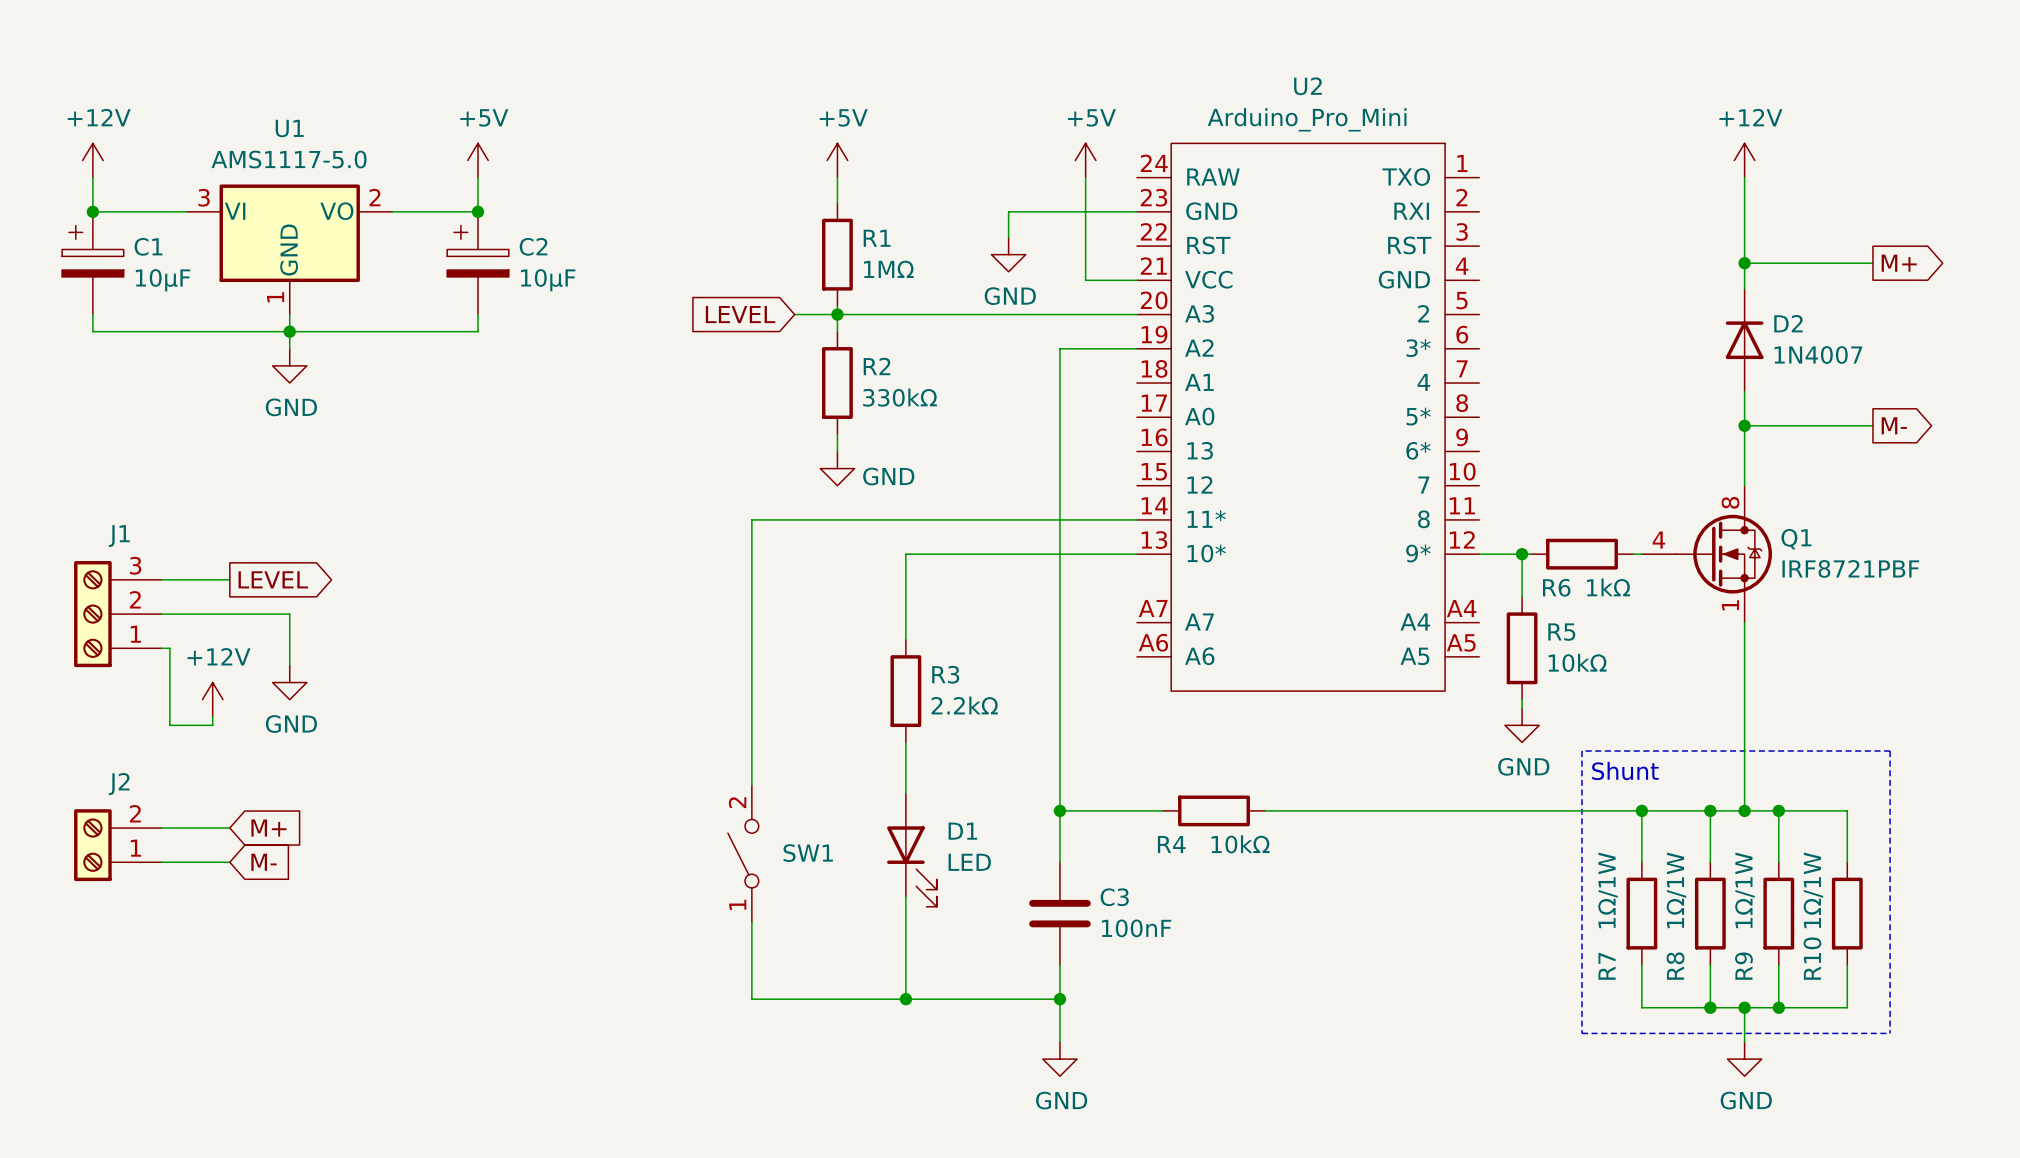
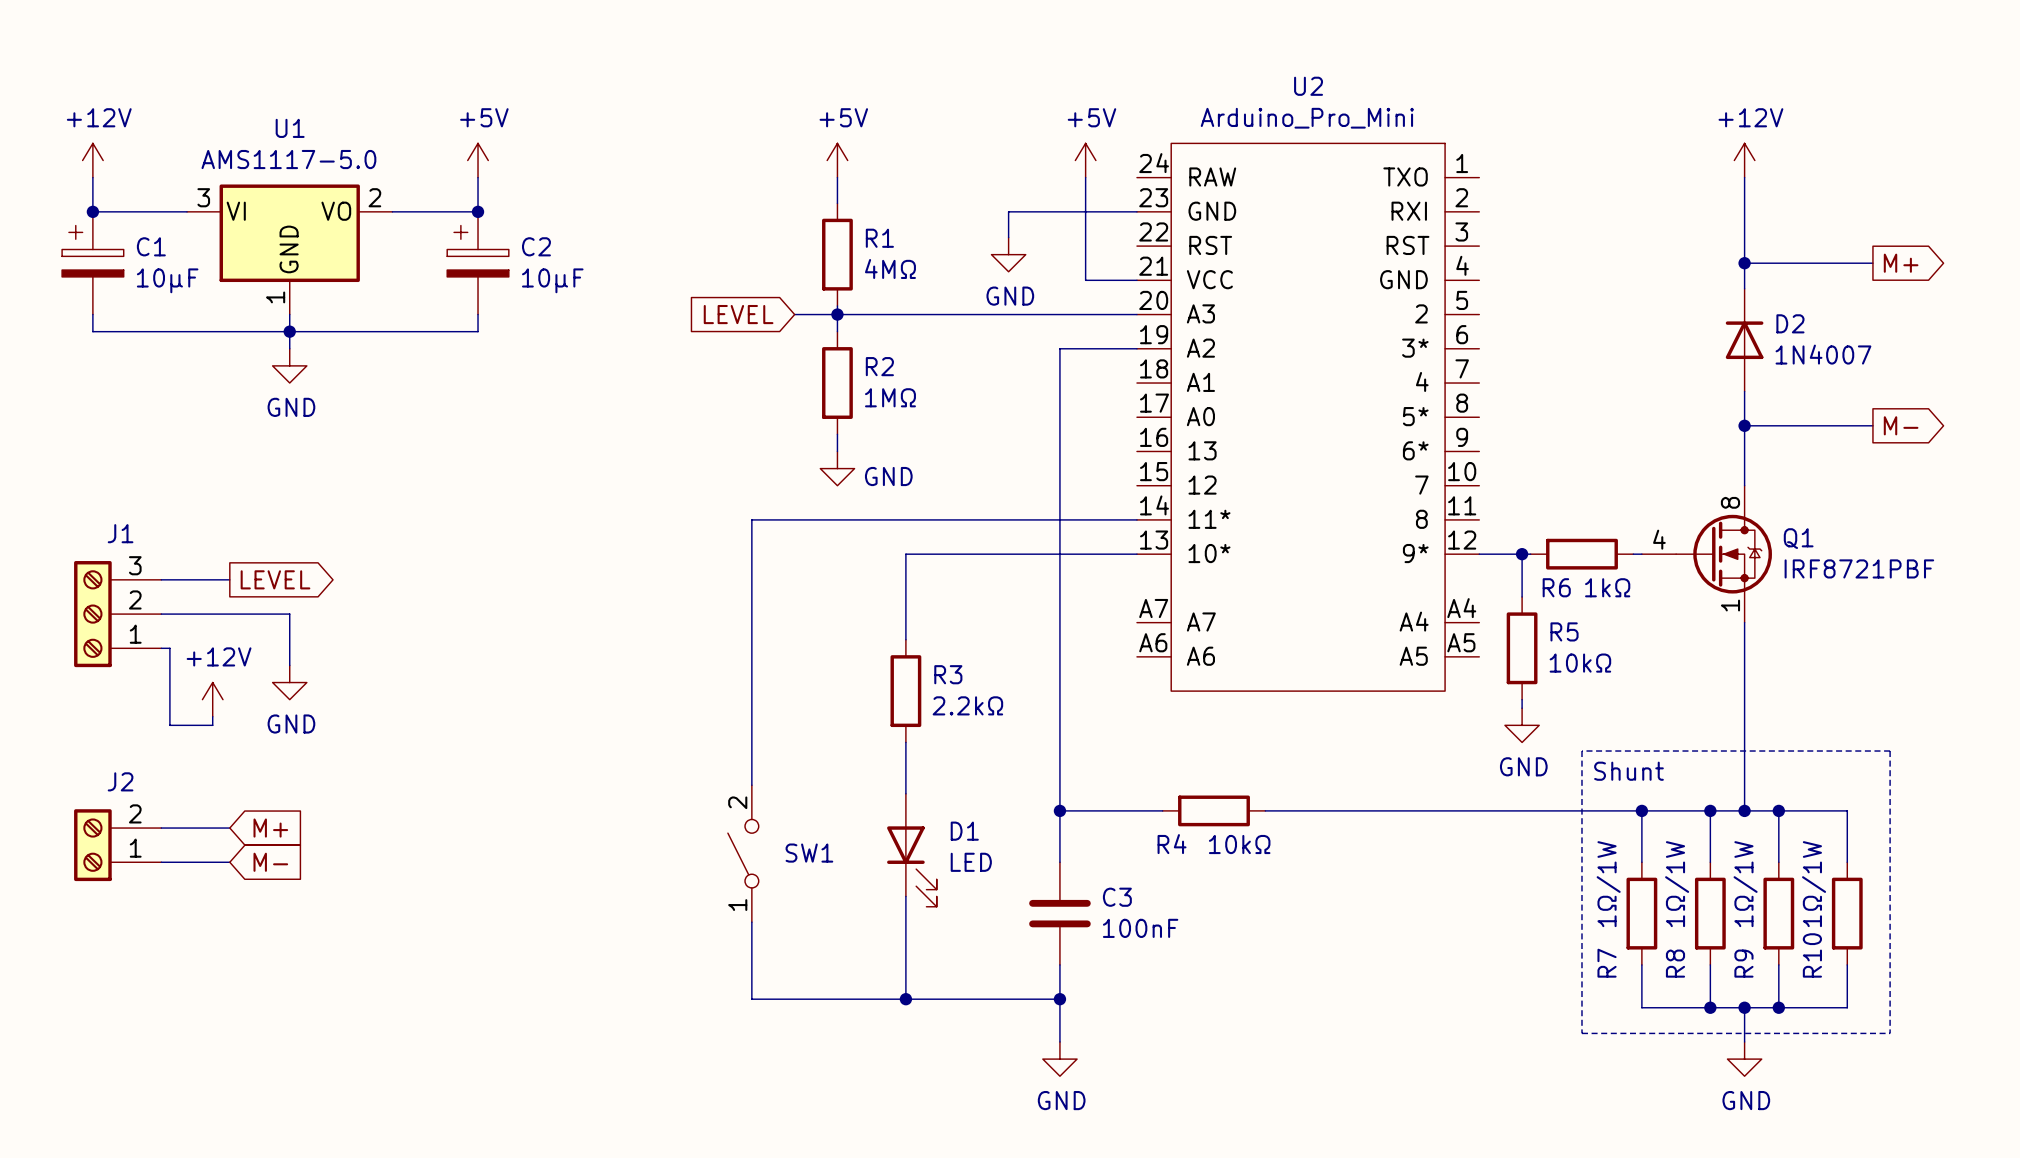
R1 value: 1MΩ (888, 269) -> 4MΩ (890, 269)
R2 value: 330kΩ (900, 397) -> 1MΩ (890, 397)

